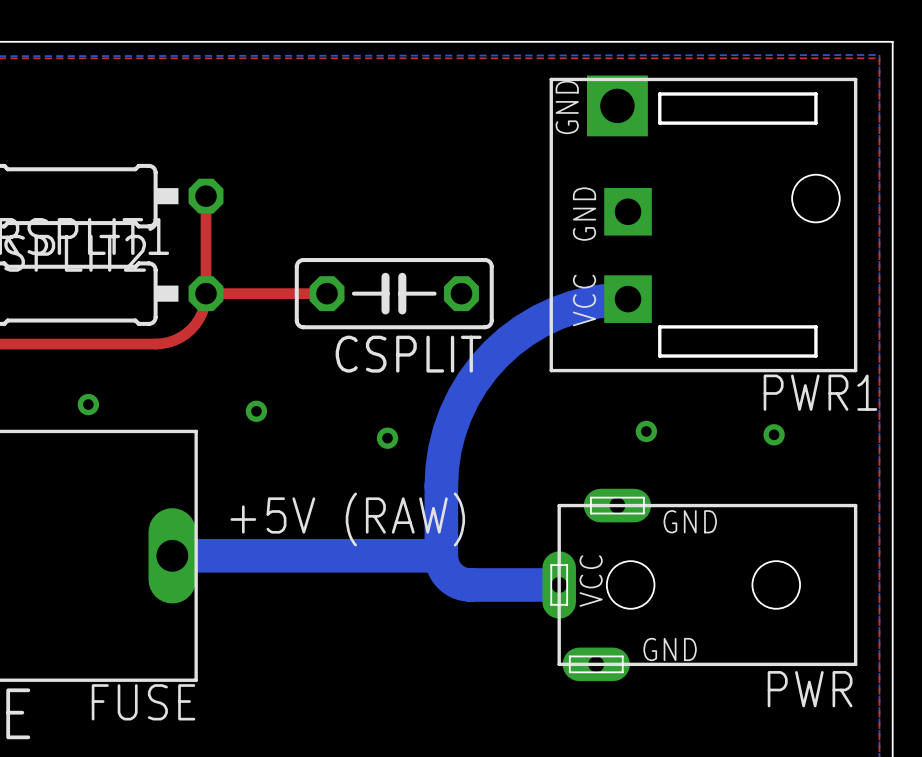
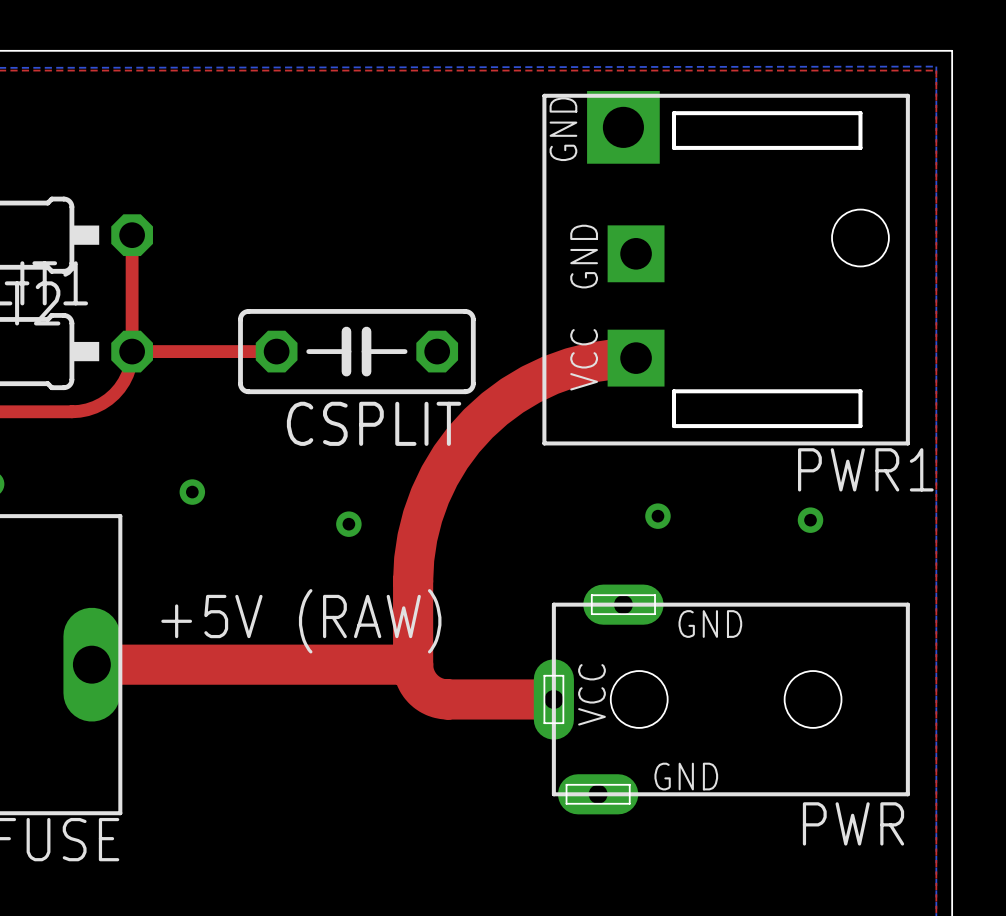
top track: none -> (636, 358) (614, 359) (571, 367) (530, 384) (512, 395) (478, 423) (450, 457) (430, 495) (417, 537) (413, 581) (413, 664)
bottom track: (628, 299) (609, 300) (573, 307) (540, 321) (524, 330) (496, 353) (472, 382) (455, 414) (444, 449) (441, 485) (441, 555) -> none
top track: none -> (91, 664) (413, 664)
bottom track: (172, 555) (441, 555) -> none
top track: none -> (413, 664) (414, 673) (420, 685) (430, 694) (438, 698) (553, 699)
bottom track: (441, 555) (447, 573) (462, 583) (559, 584) -> none

